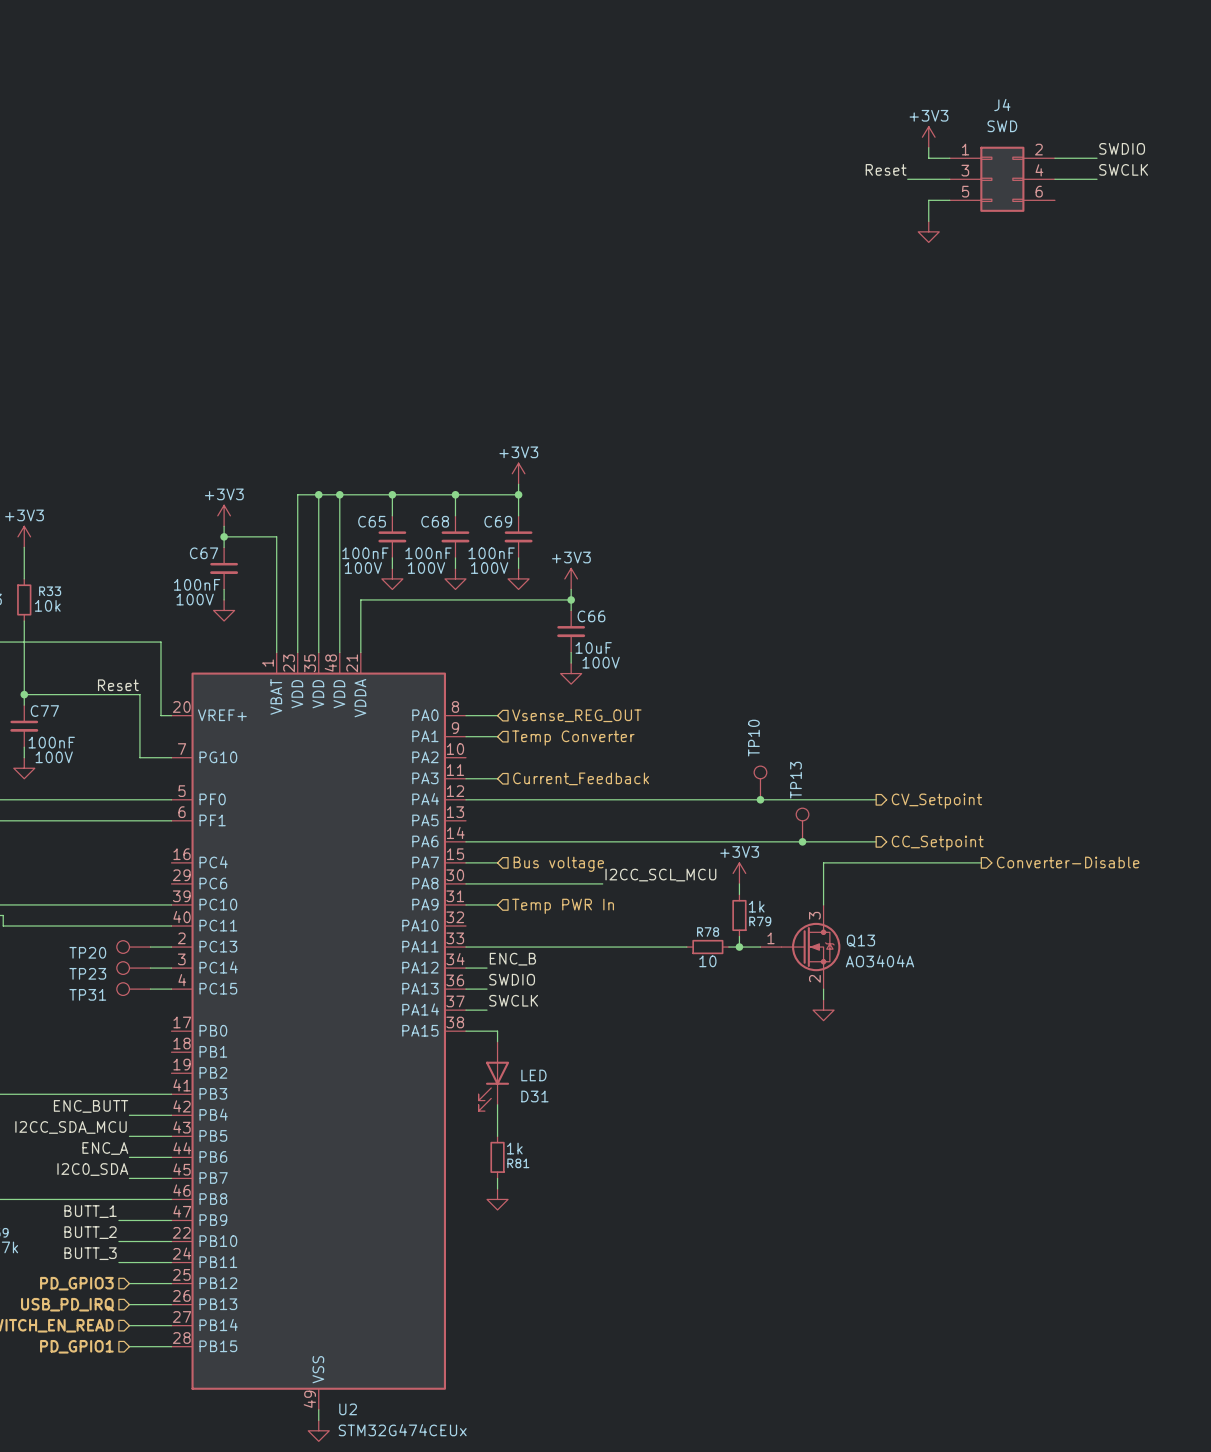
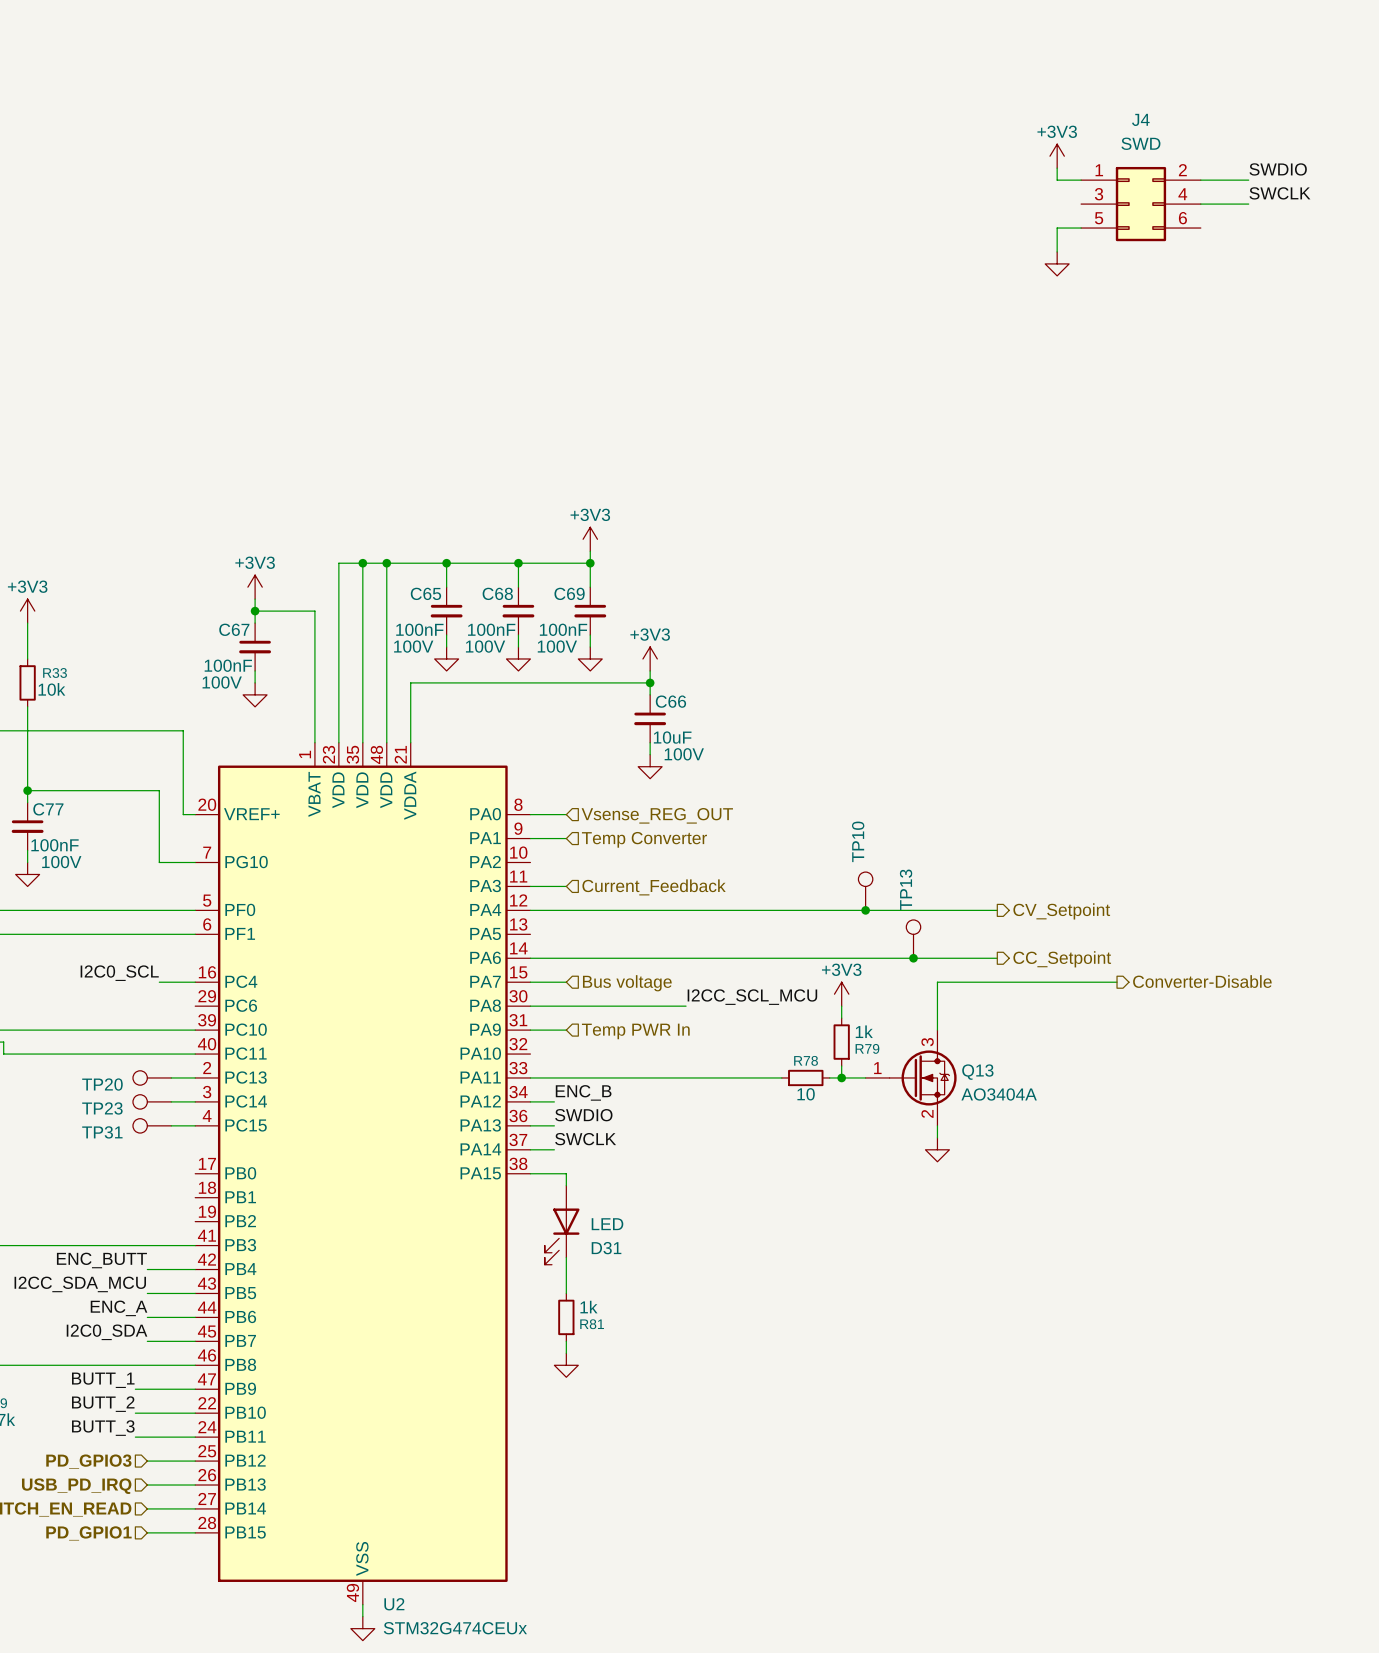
label: Reset (886, 169) -> none
wire: (907, 179) (949, 179) -> none
label: Reset (118, 685) -> none
label: none -> I2C0_SCL (119, 973)
wire: none -> (159, 982) (195, 982)

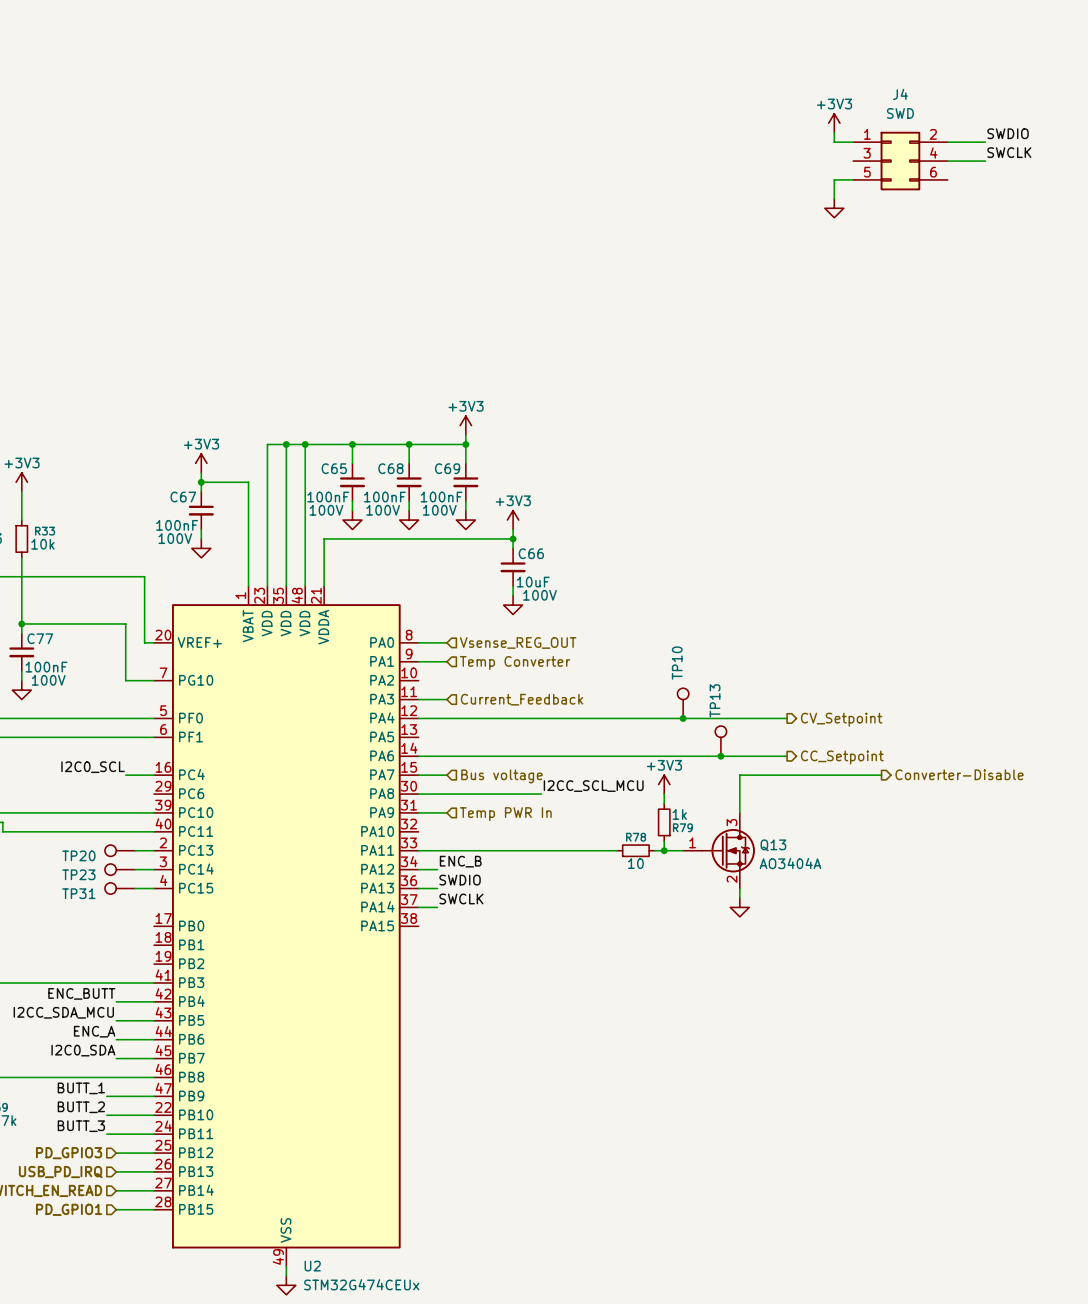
wire: (530, 1173) (566, 1173) (566, 1185) -> none
D31: LED (562, 1225) -> none
wire: (566, 1257) (566, 1293) -> none
R81: 1k (566, 1317) -> none
wire: (566, 1341) (566, 1353) -> none
power symbol: (566, 1365) -> none

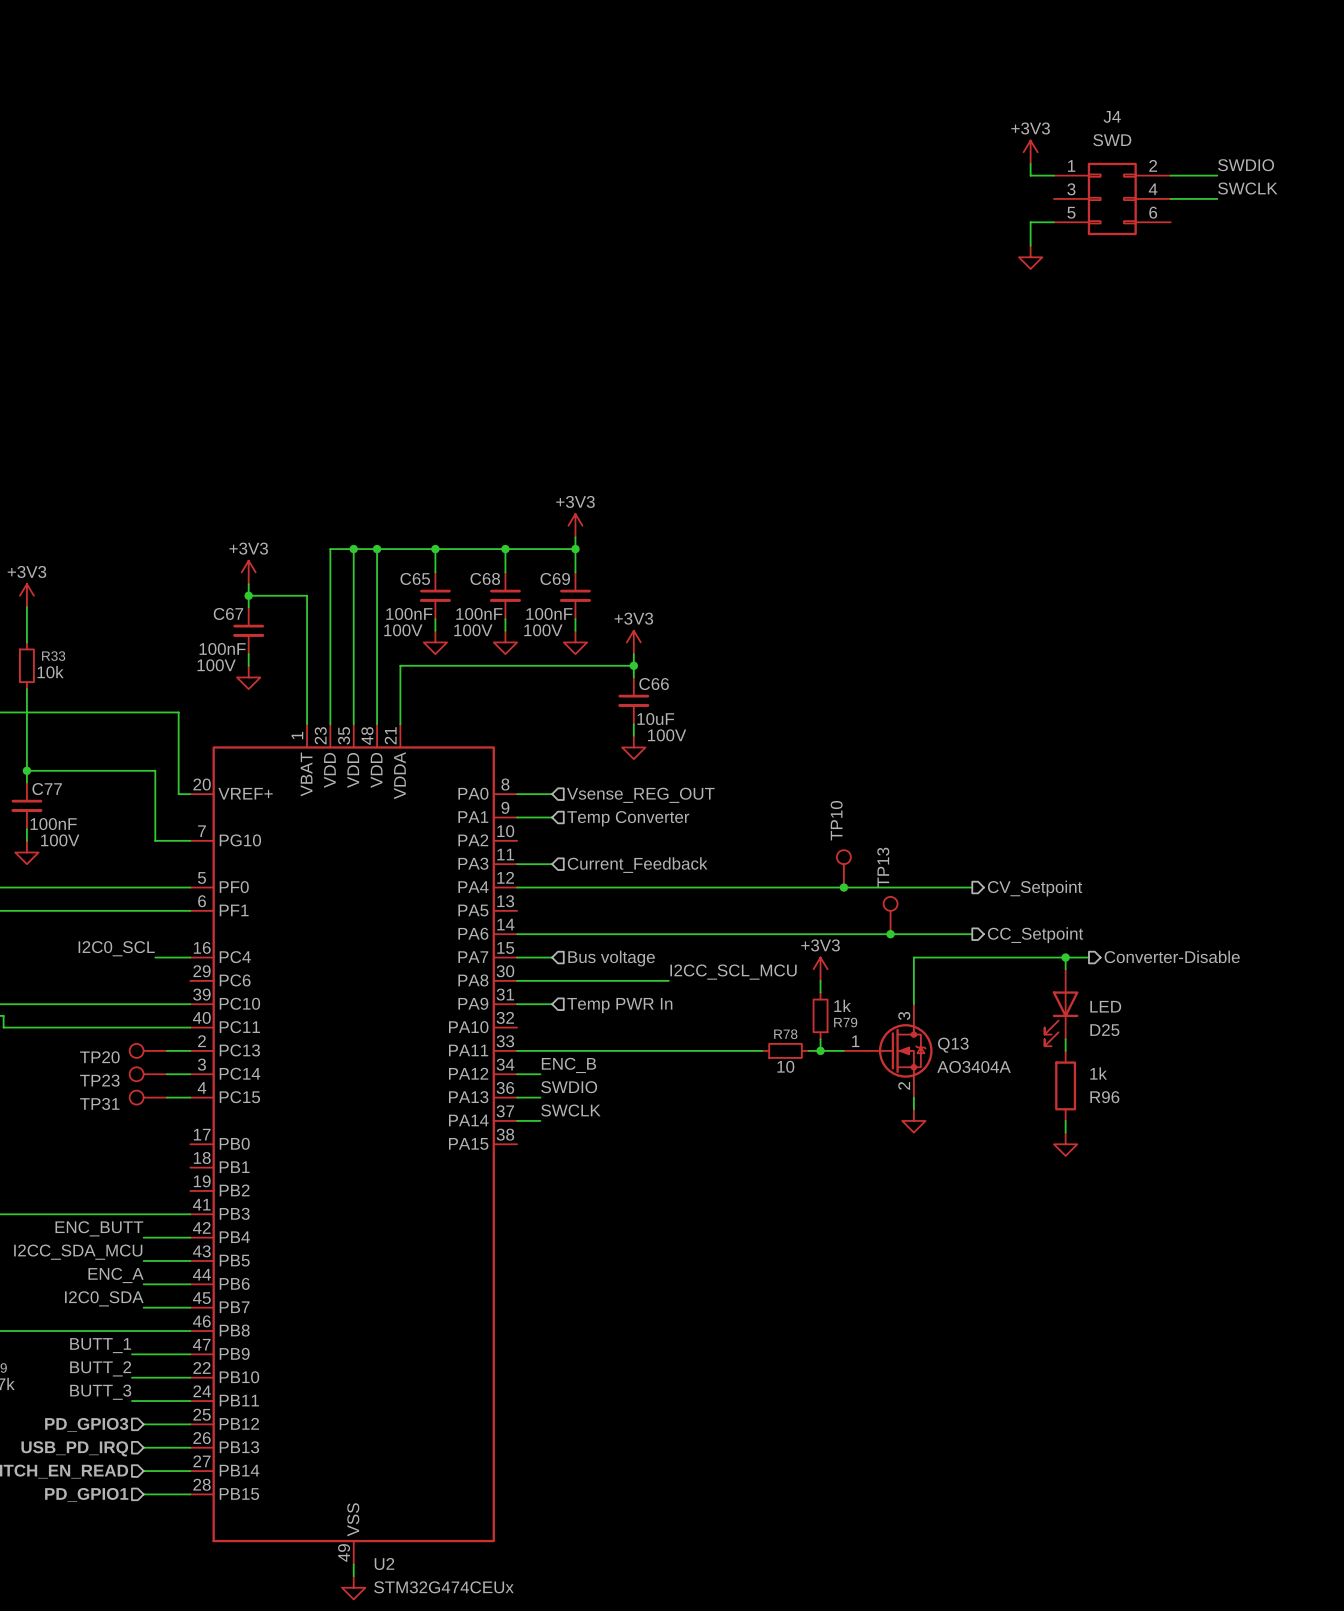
wire: none -> (1065, 957) (1065, 969)
junction: none -> (1065, 957)
D25: none -> LED (1061, 1007)
wire: none -> (1065, 1039) (1065, 1050)
R96: none -> 1k (1065, 1085)
wire: none -> (1065, 1120) (1065, 1132)
power symbol: none -> (1065, 1144)

